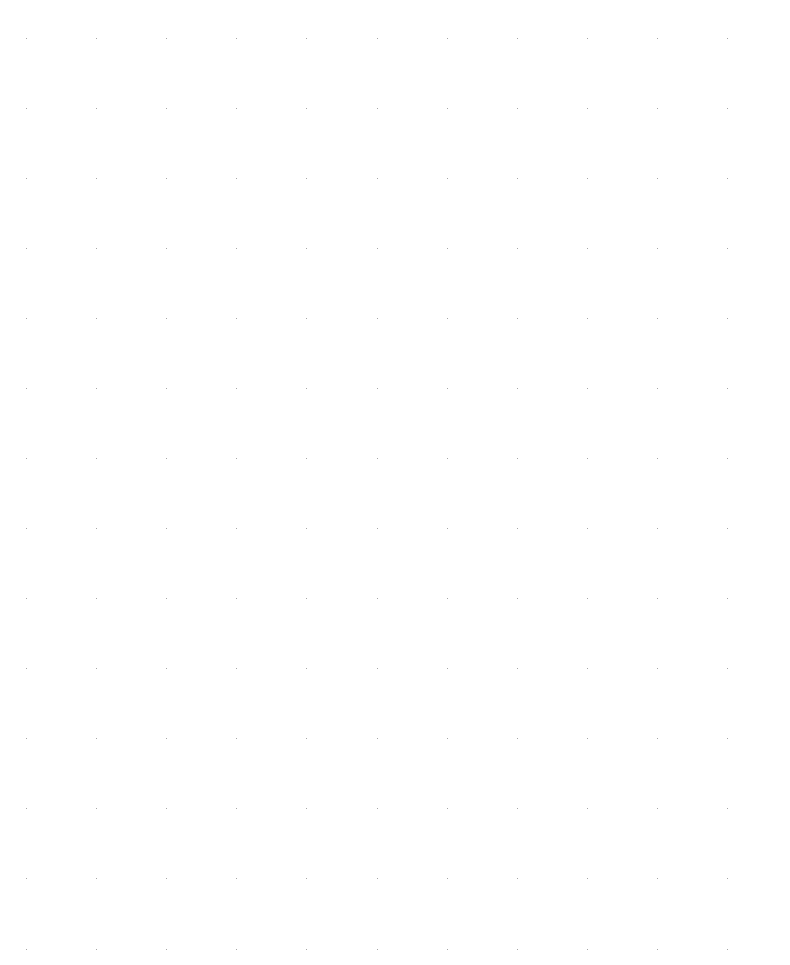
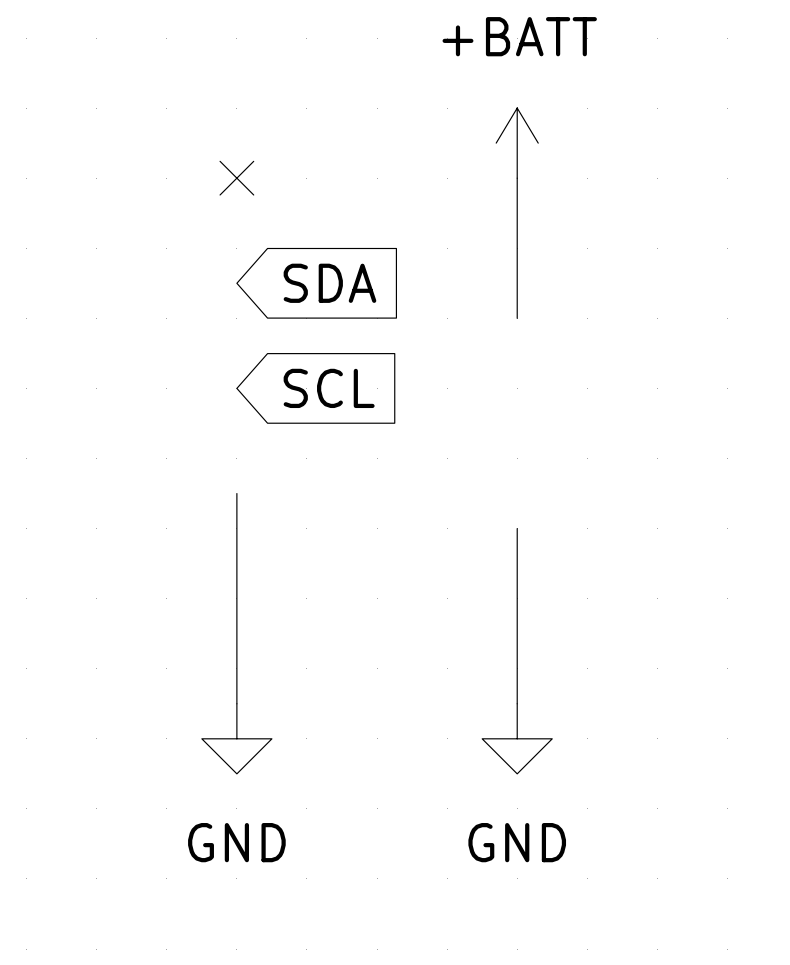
power symbol: none -> +BATT (517, 143)
no-connect mark: none -> (236, 178)
wire: none -> (517, 178) (517, 318)
global label: none -> SDA (329, 283)
global label: none -> SCL (329, 388)
wire: none -> (236, 493) (236, 703)
wire: none -> (517, 528) (517, 703)
power symbol: none -> GND (236, 738)
power symbol: none -> GND (517, 738)

